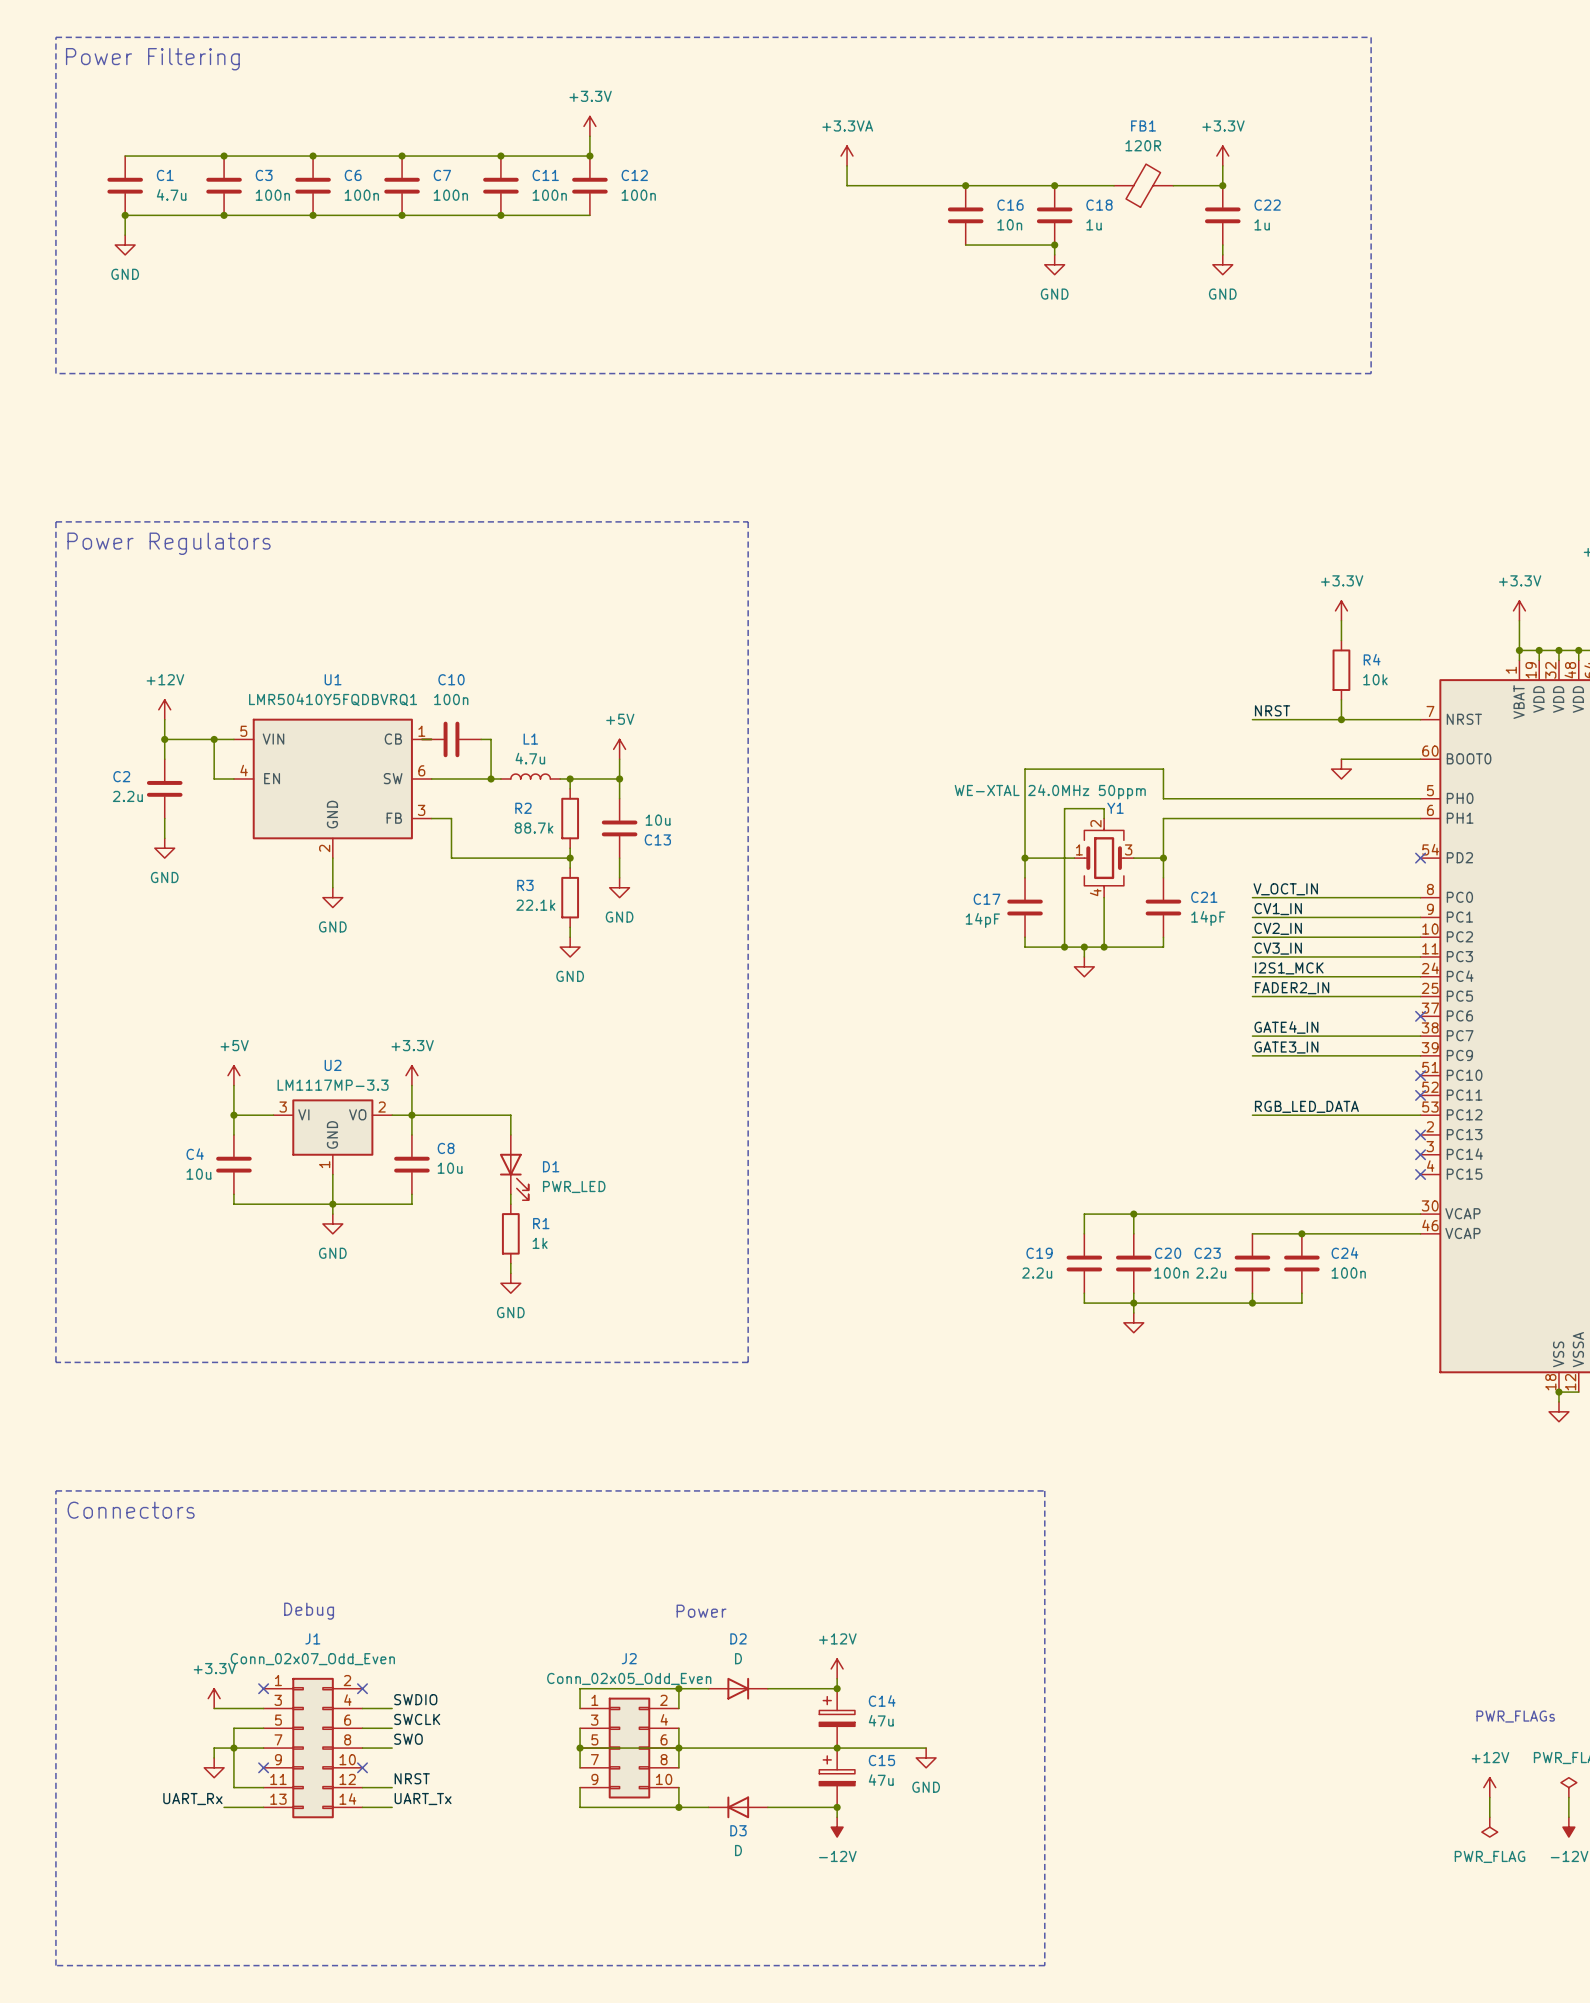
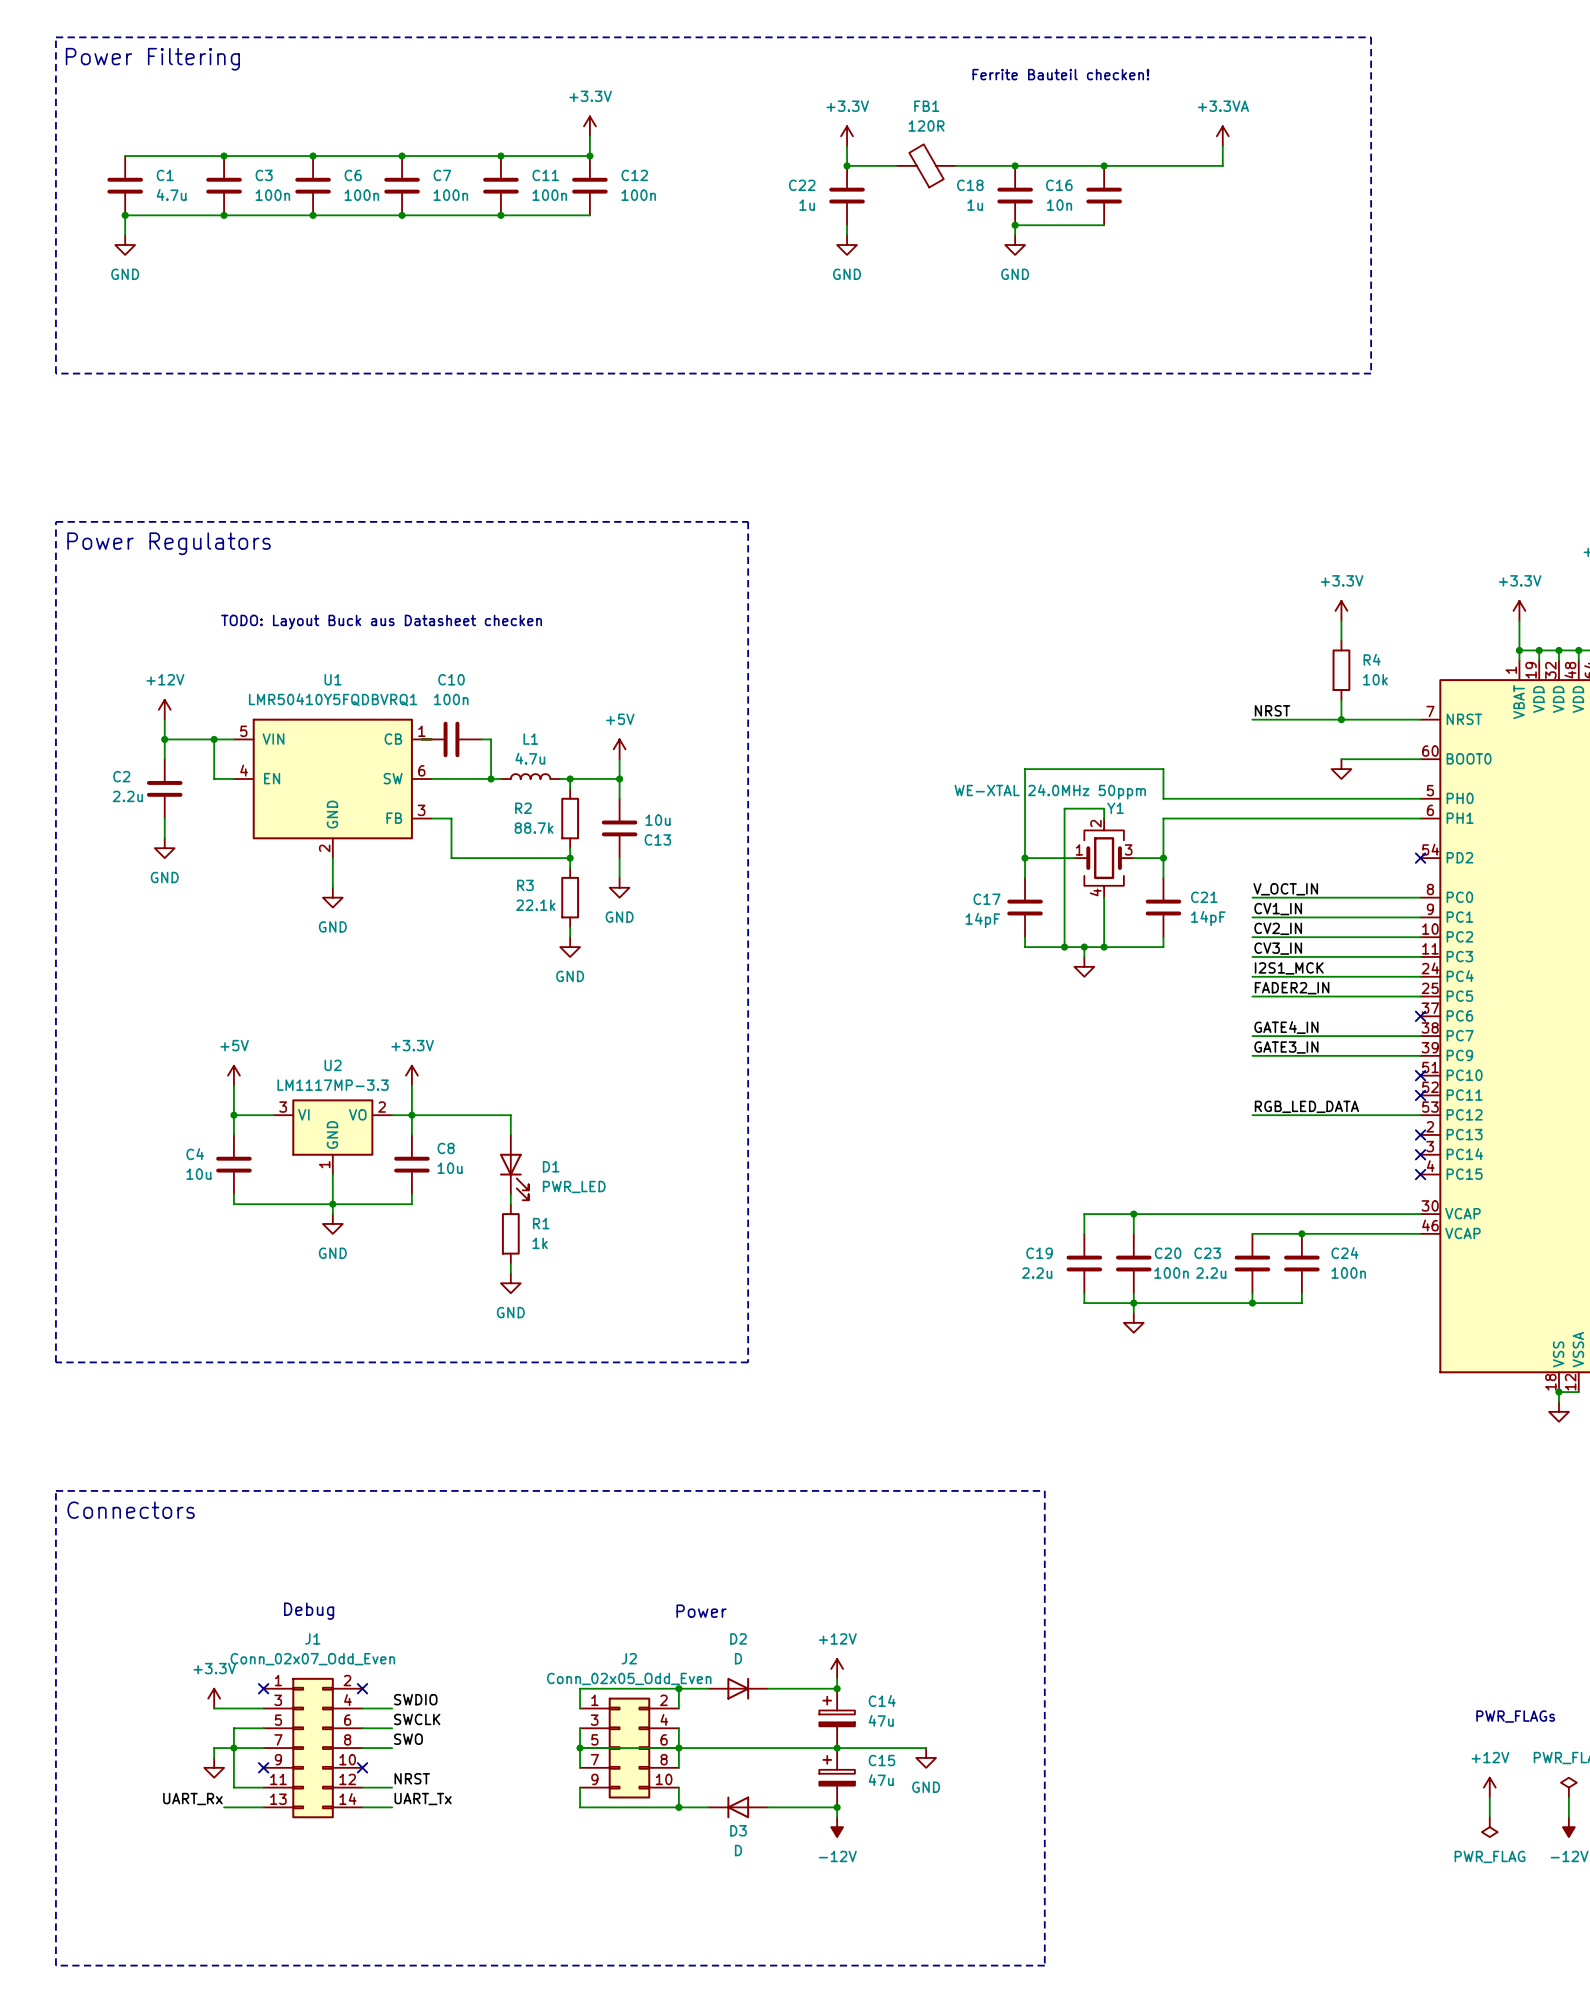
text: none -> Ferrite Bauteil checken! (1060, 74)
power symbol: none -> +3.3V (847, 136)
power symbol: none -> +3.3VA (1222, 136)
wire: none -> (847, 146) (847, 165) (896, 165)
wire: none -> (1222, 146) (1222, 165) (955, 165)
power symbol: +3.3VA (847, 156) -> none
power symbol: +3.3V (1222, 156) -> none
wire: (847, 165) (847, 185) (1114, 185) -> none
junction: none -> (847, 165)
junction: none -> (1015, 165)
junction: none -> (1104, 165)
wire: (1222, 165) (1222, 185) (1173, 185) -> none
junction: (965, 185) -> none
junction: (1054, 185) -> none
FB1 flip: as is (1143, 185) -> left-right (926, 165)
FB1 position: (1143, 185) -> (926, 165)
junction: (1222, 185) -> none
C16 name position: C16 (1010, 205) -> C16 (1059, 185)
C18 name position: C18 (1099, 205) -> C18 (970, 185)
C22 name position: C22 (1267, 205) -> C22 (802, 185)
C16 position: (965, 215) -> (1104, 195)
C18 position: (1054, 215) -> (1015, 195)
C22 position: (1222, 215) -> (847, 195)
C16 value position: 10n (1009, 224) -> 10n (1059, 205)
C18 value position: 1u (1094, 224) -> 1u (975, 205)
C22 value position: 1u (1262, 224) -> 1u (807, 205)
wire: none -> (847, 225) (847, 235)
junction: none -> (1015, 225)
wire: none -> (1104, 225) (1015, 225) (1015, 235)
power symbol: none -> GND (847, 245)
wire: (965, 245) (1054, 245) (1054, 254) -> none
junction: (1054, 245) -> none
wire: (1222, 245) (1222, 254) -> none
power symbol position: GND (1054, 264) -> GND (1015, 245)
power symbol: GND (1222, 264) -> none
text: none -> TODO: Layout Buck aus Datasheet checken (381, 622)

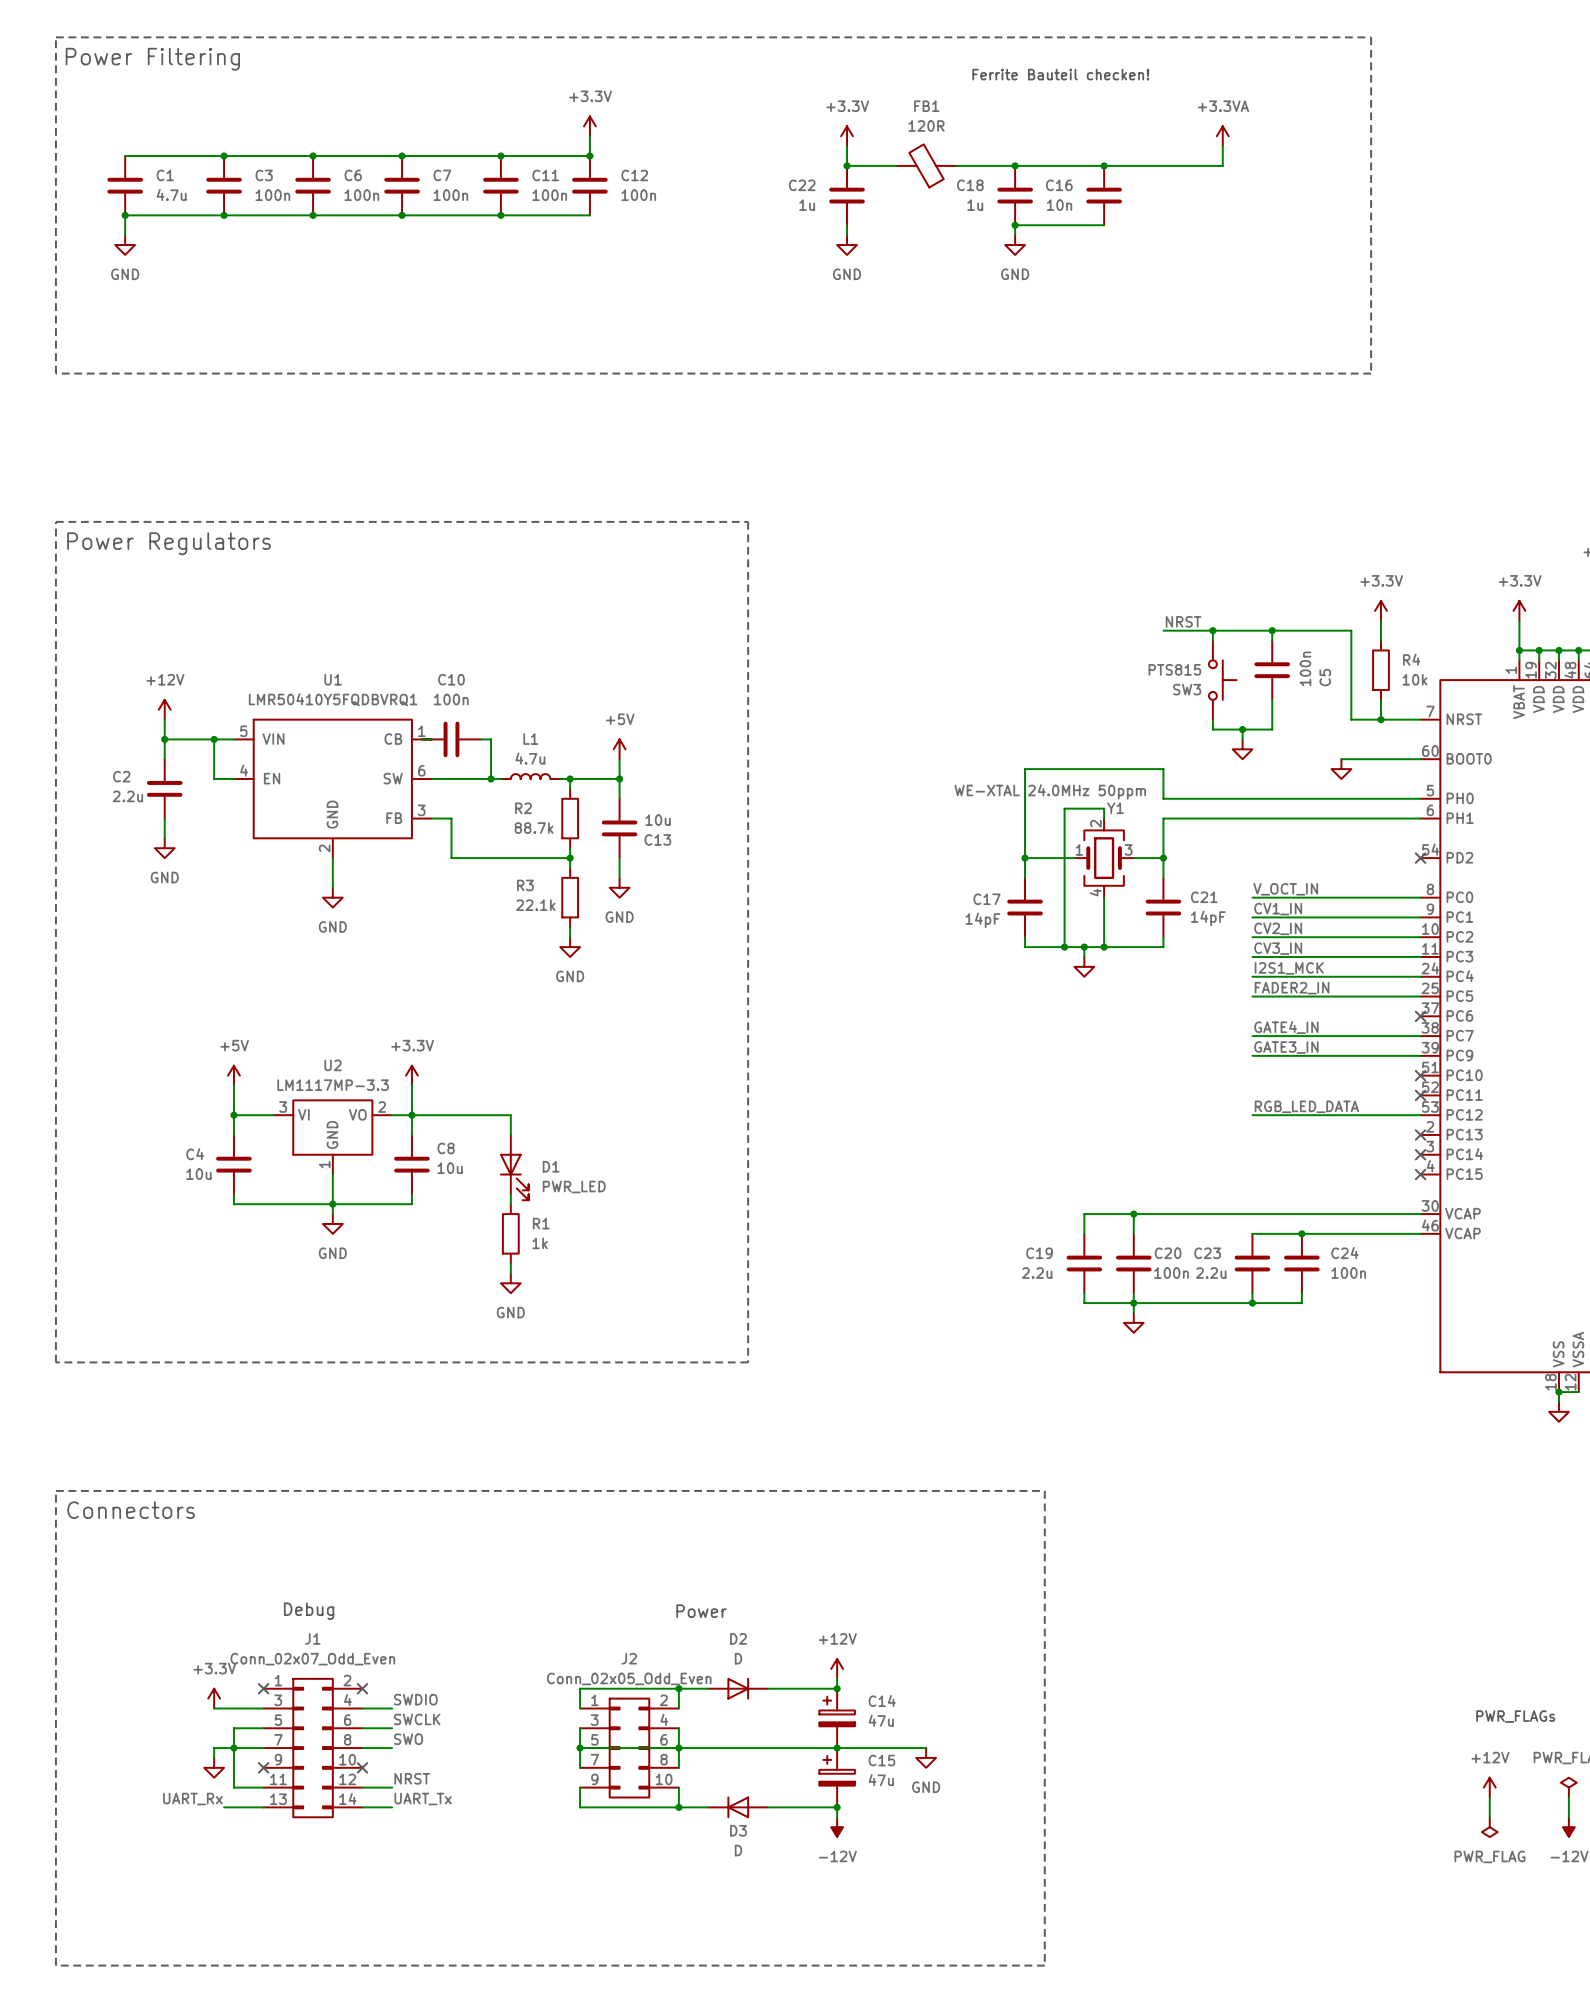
power symbol position: +3.3V (1341, 610) -> +3.3V (1380, 610)
wire: (1341, 620) (1341, 640) -> (1380, 620) (1380, 640)
text: TODO: Layout Buck aus Datasheet checken (381, 622) -> none
wire: none -> (1212, 630) (1212, 640)
junction: none -> (1212, 630)
wire: none -> (1272, 630) (1272, 640)
junction: none -> (1272, 630)
C5: none -> 100n (1272, 670)
R4 position: (1341, 670) -> (1380, 670)
SW3: none -> PTS815 (1222, 680)
wire: none -> (1272, 699) (1272, 729) (1212, 729) (1212, 719)
wire: (1341, 699) (1341, 719) -> (1380, 699) (1380, 719)
label position: NRST (1272, 710) -> NRST (1183, 621)
wire: (1252, 719) (1351, 719) -> (1163, 630) (1351, 630) (1351, 719)
junction position: (1341, 719) -> (1380, 719)
wire: none -> (1242, 729) (1242, 739)
junction: none -> (1242, 729)
power symbol: none -> (1242, 749)

